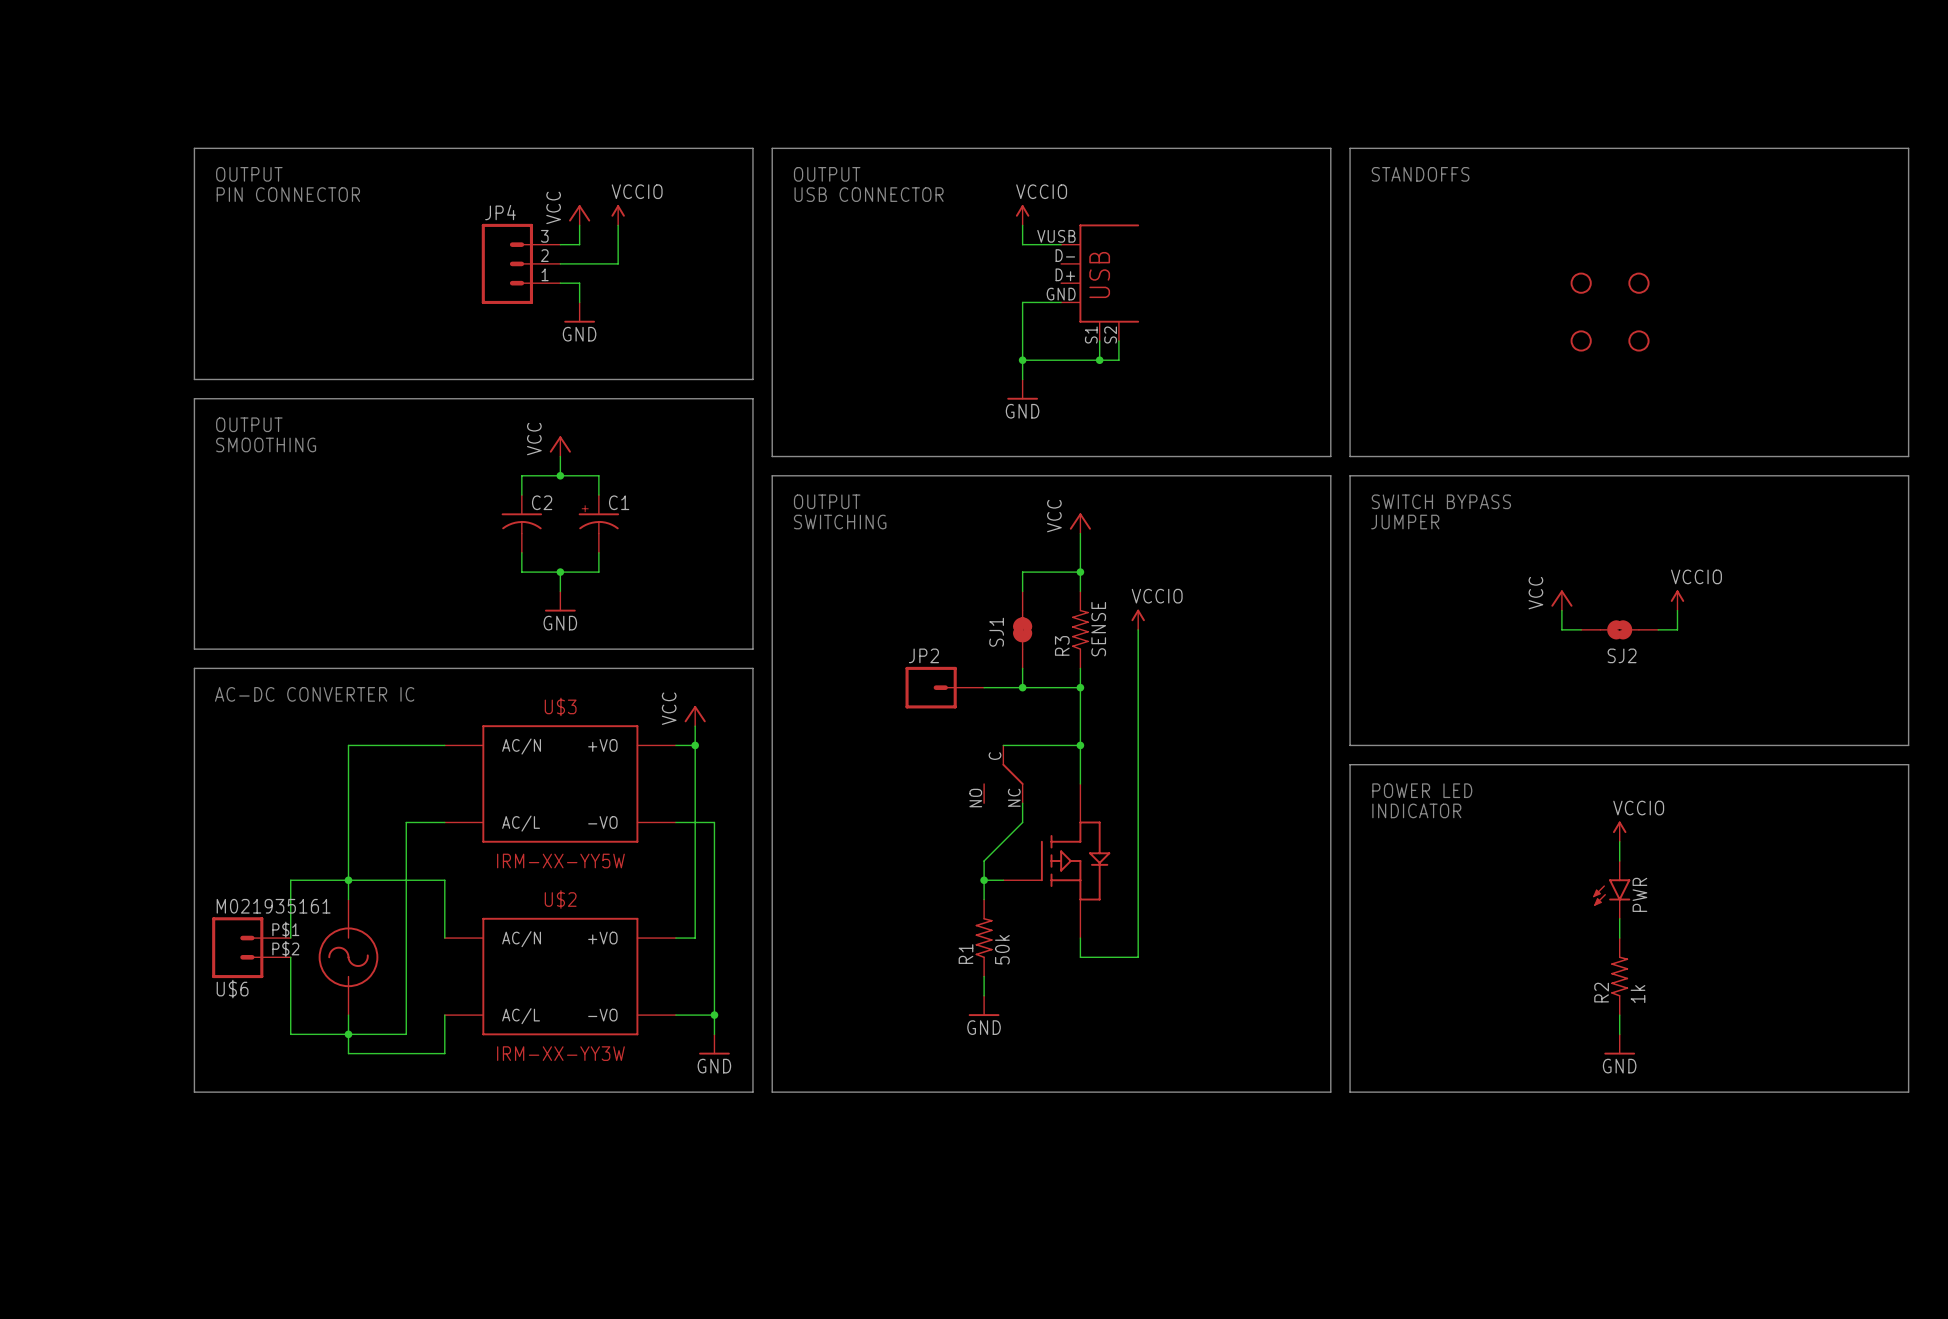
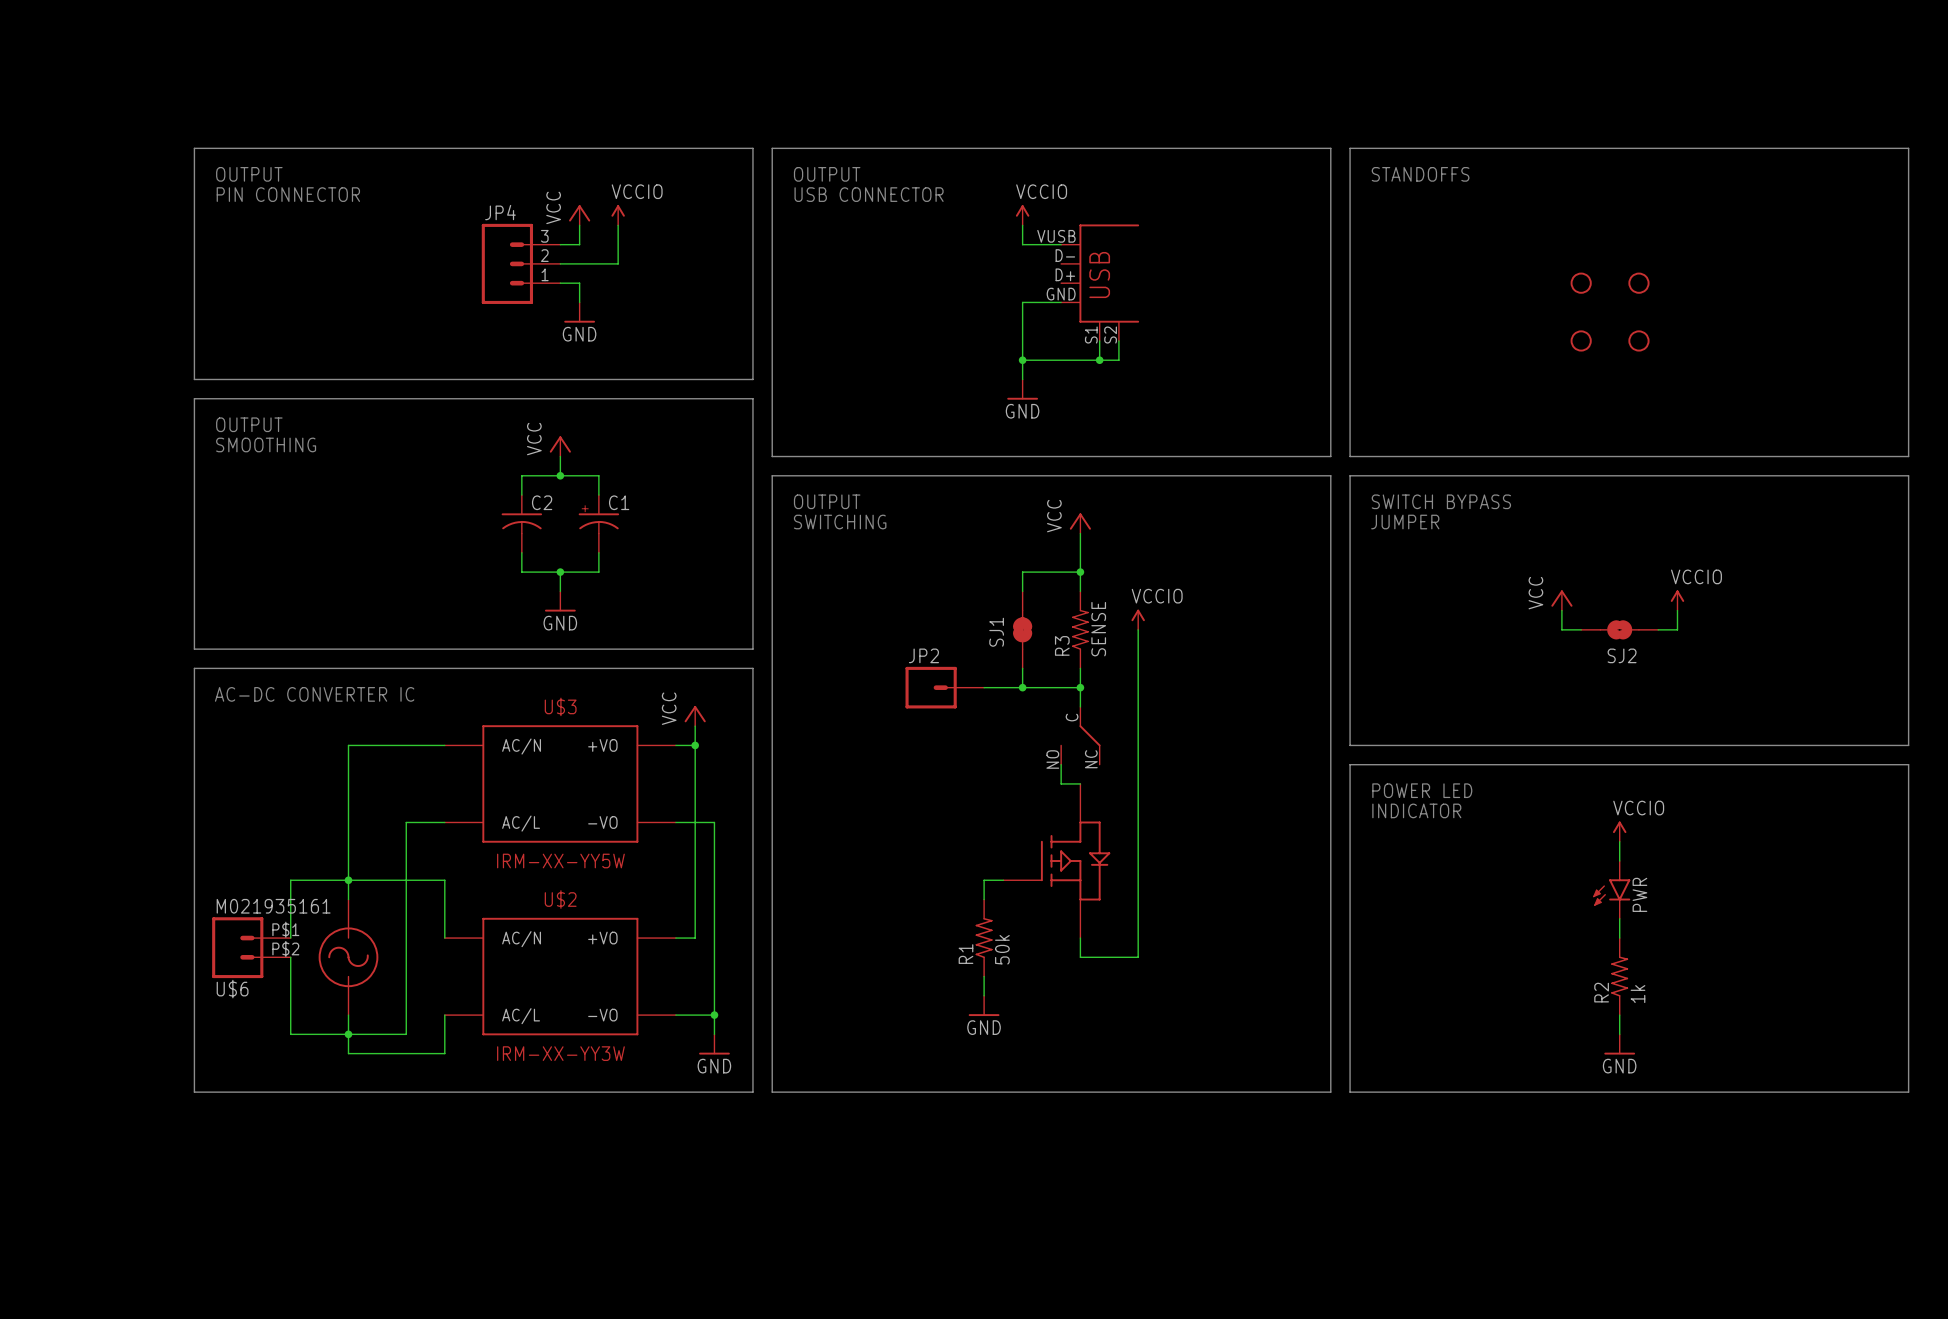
wire: (1080, 706) (1080, 783) -> (1061, 764) (1061, 783) (1080, 783)
wire: (1003, 745) (1080, 745) -> none
junction: (1080, 745) -> none
part position: (1003, 774) -> (1080, 735)
wire: (1022, 803) (1022, 822) (984, 861) (984, 880) -> none
junction: (984, 880) -> none

